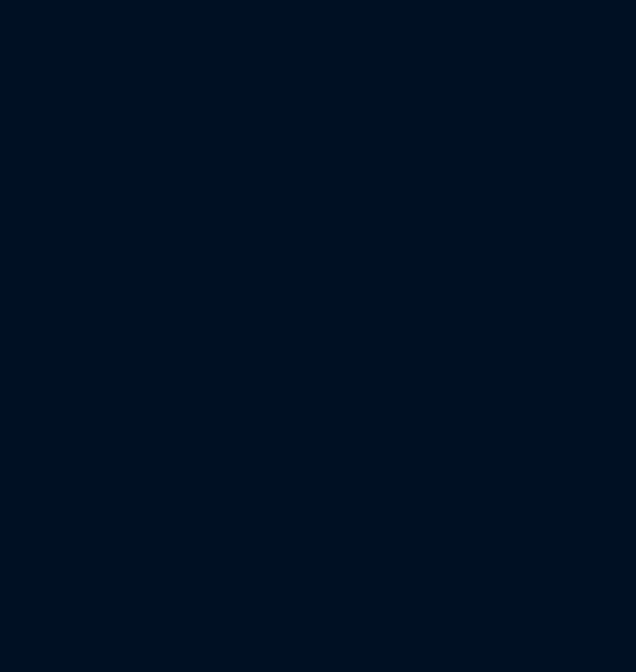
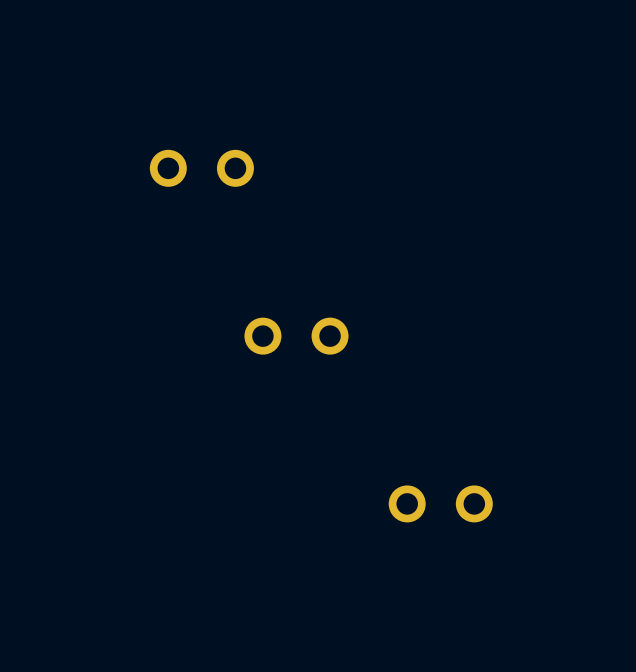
part: none -> (201, 168)
part: none -> (296, 336)
part: none -> (440, 503)

